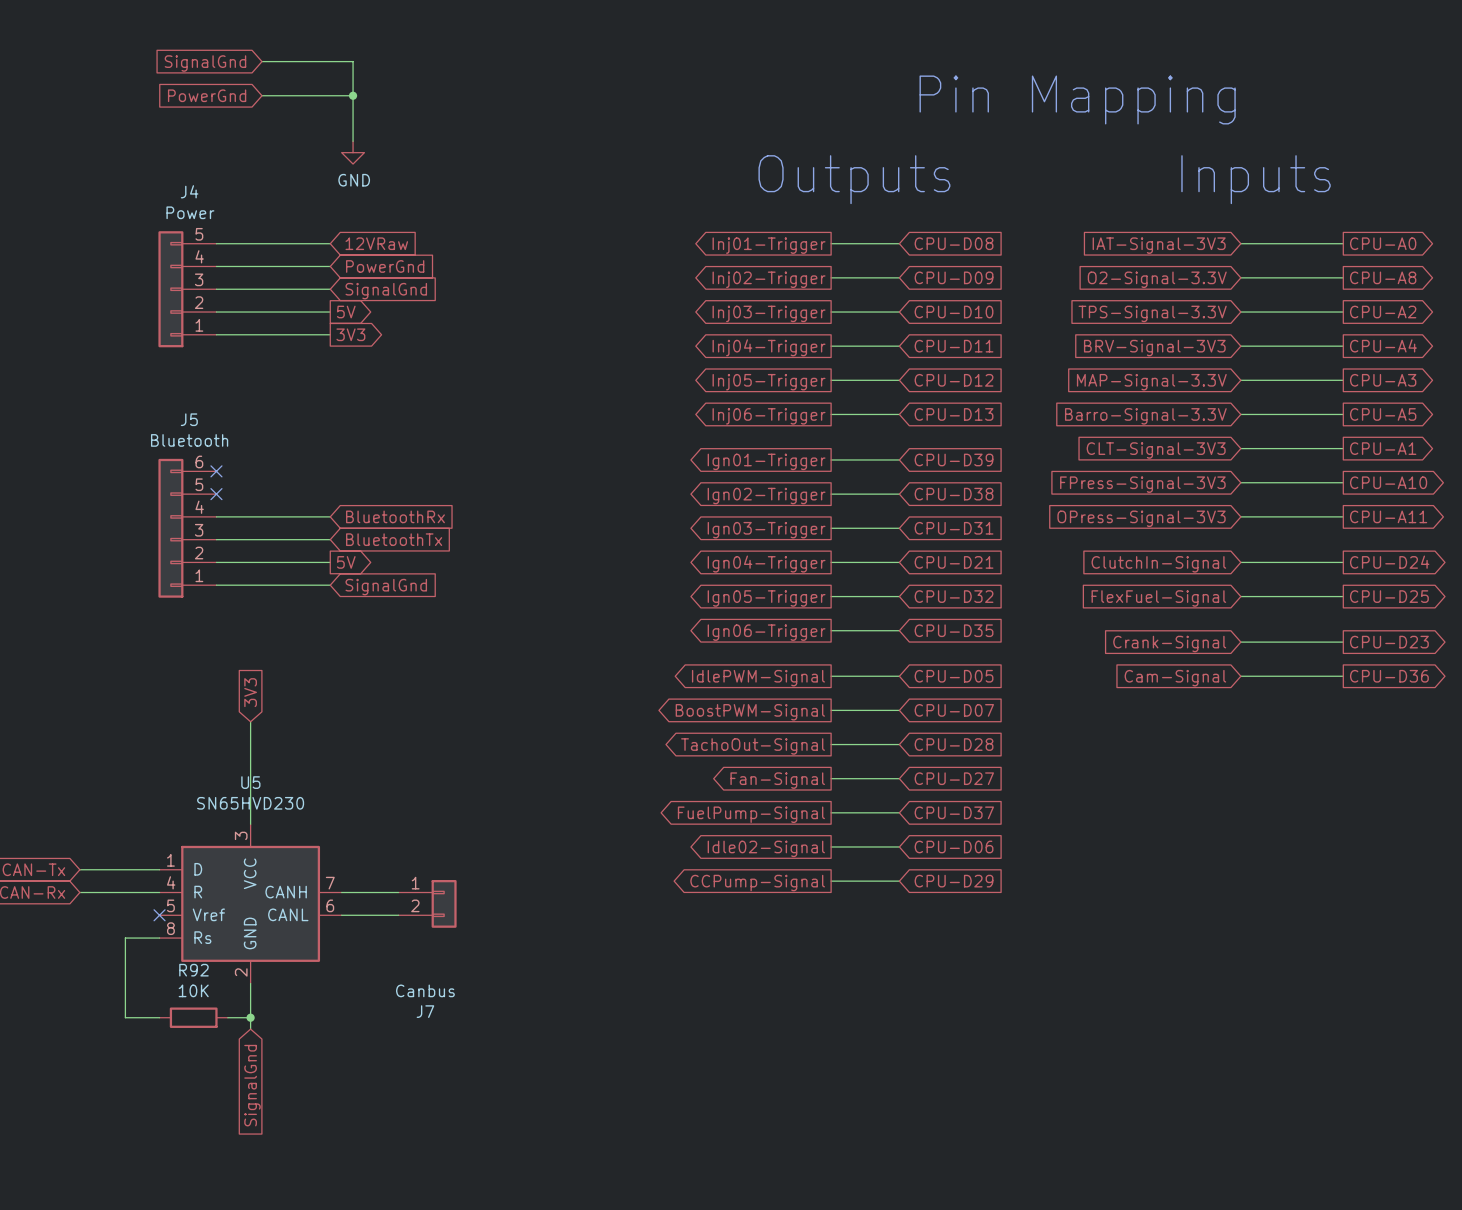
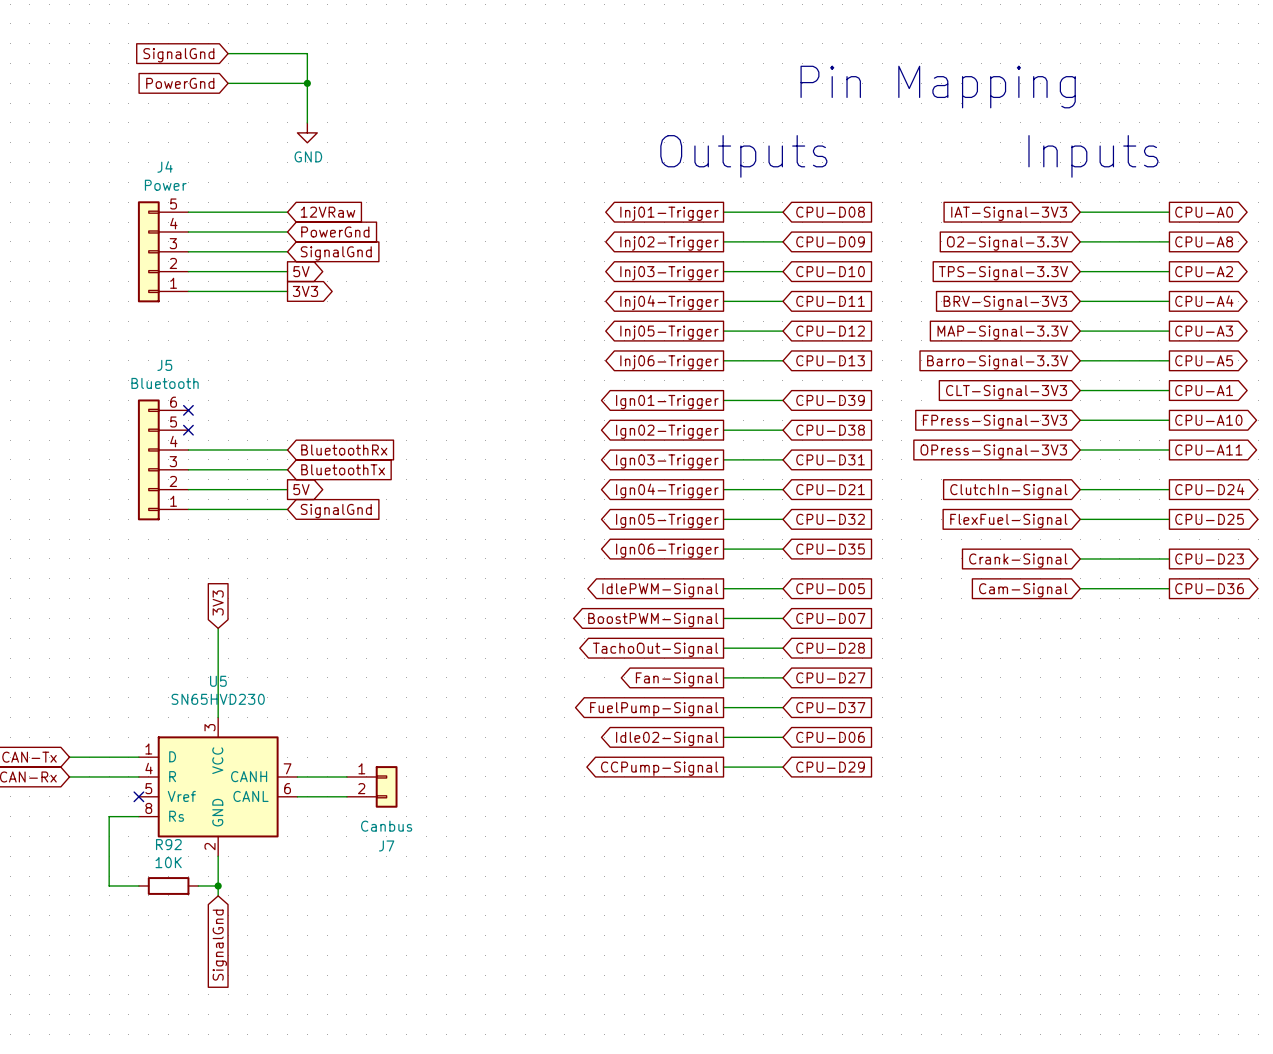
J7 value position: Canbus (425, 990) -> Canbus (386, 826)
J7 name position: J7 (425, 1011) -> J7 (386, 845)

